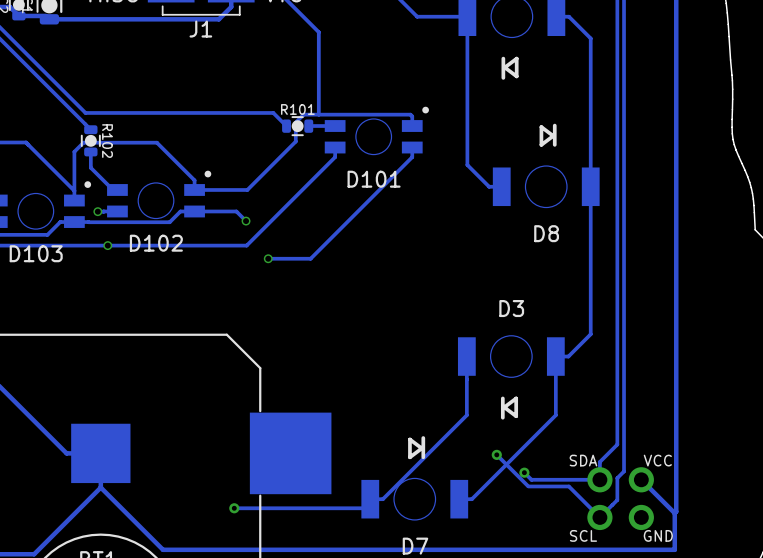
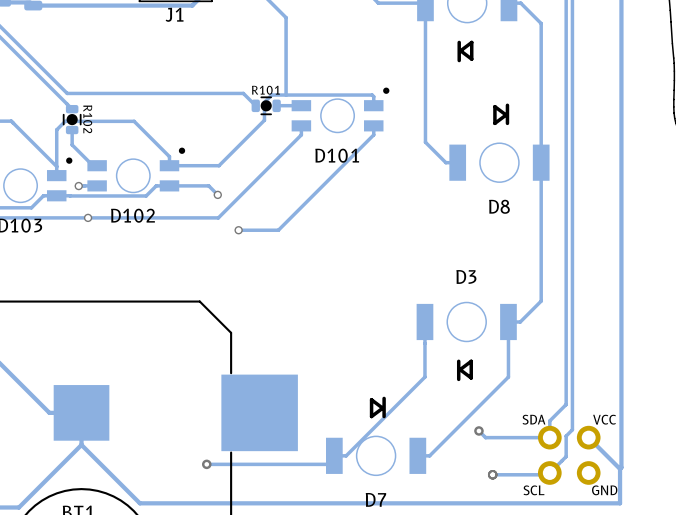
track: (496, 454) (527, 486) -> none
via position: (496, 454) -> (492, 474)
track: (528, 486) (568, 486) (599, 517) -> (492, 474) (548, 474) (549, 472)

